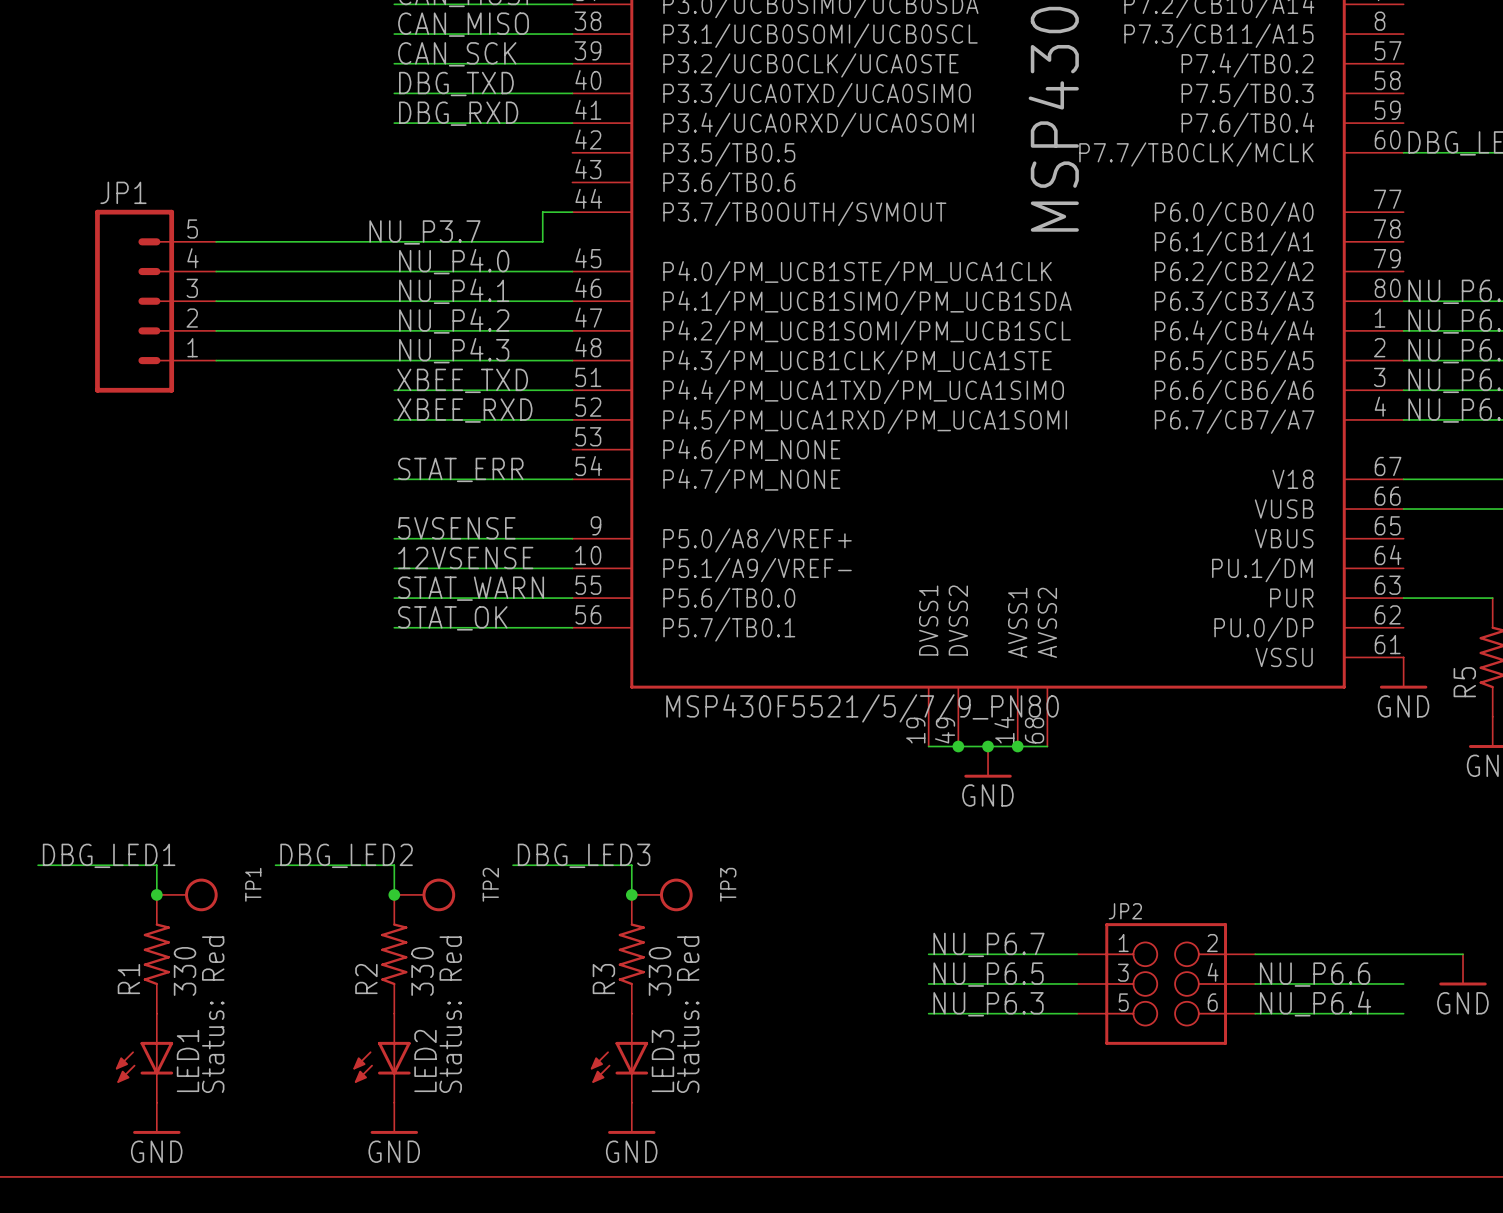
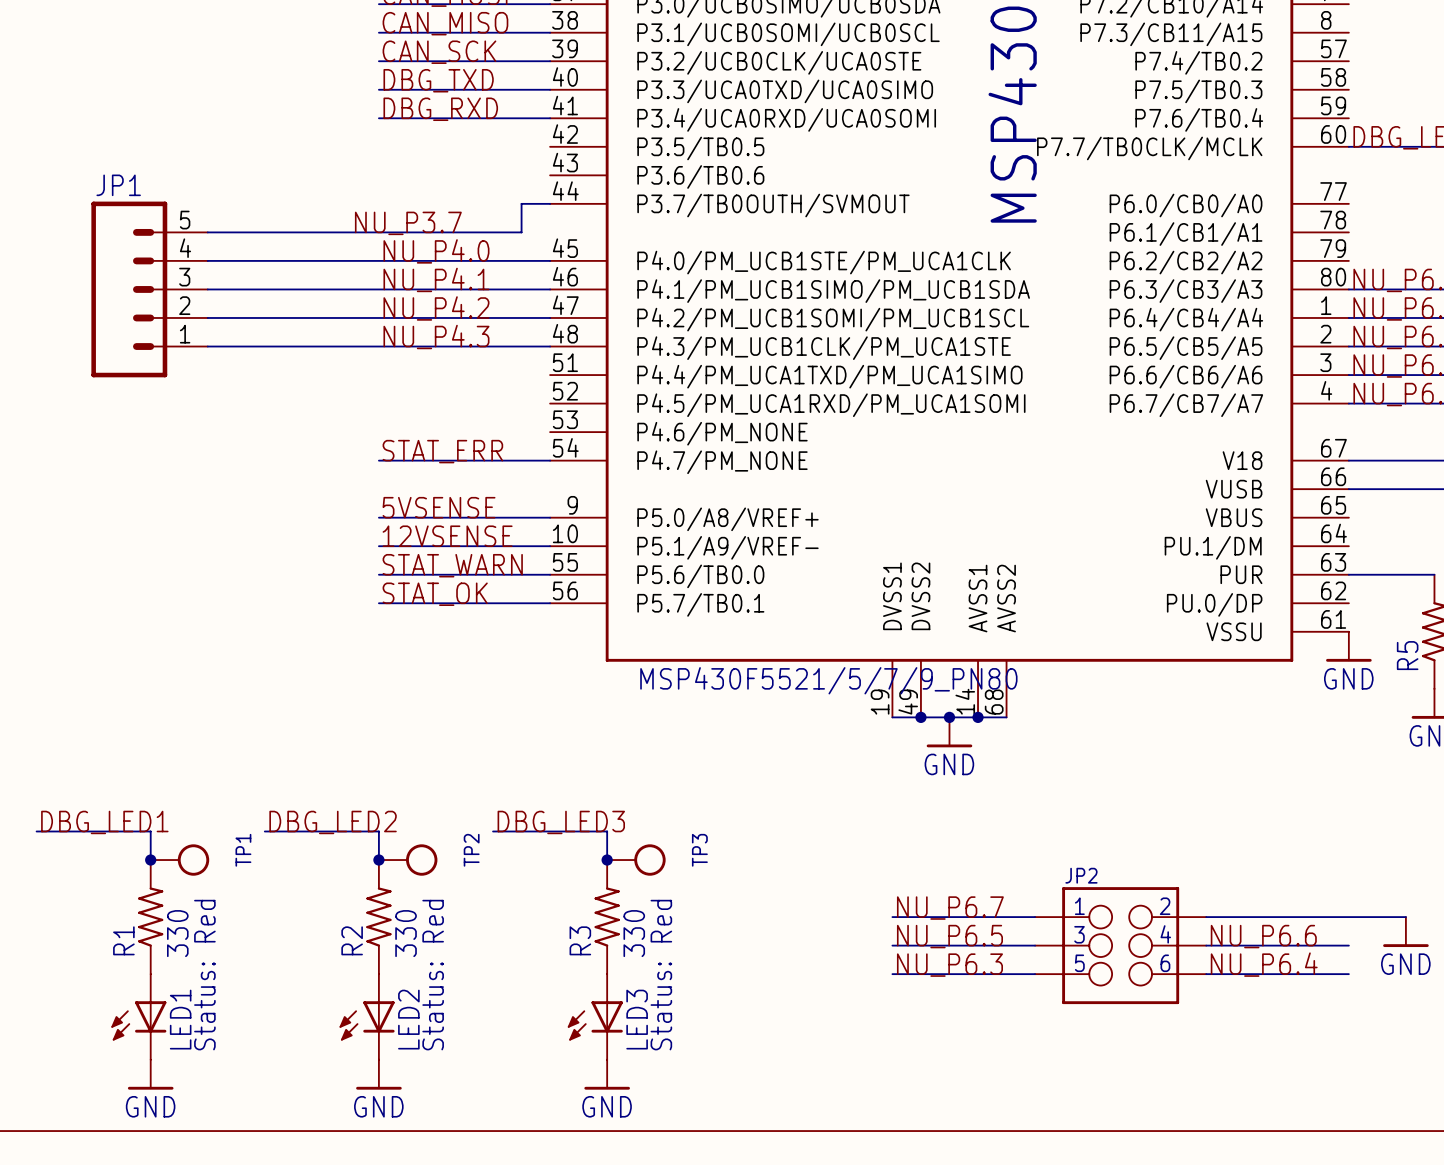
label: XBEE_TXD (462, 380) -> none
wire: (394, 390) (572, 390) -> none
label: XBEE_RXD (464, 410) -> none
wire: (394, 419) (572, 419) -> none

